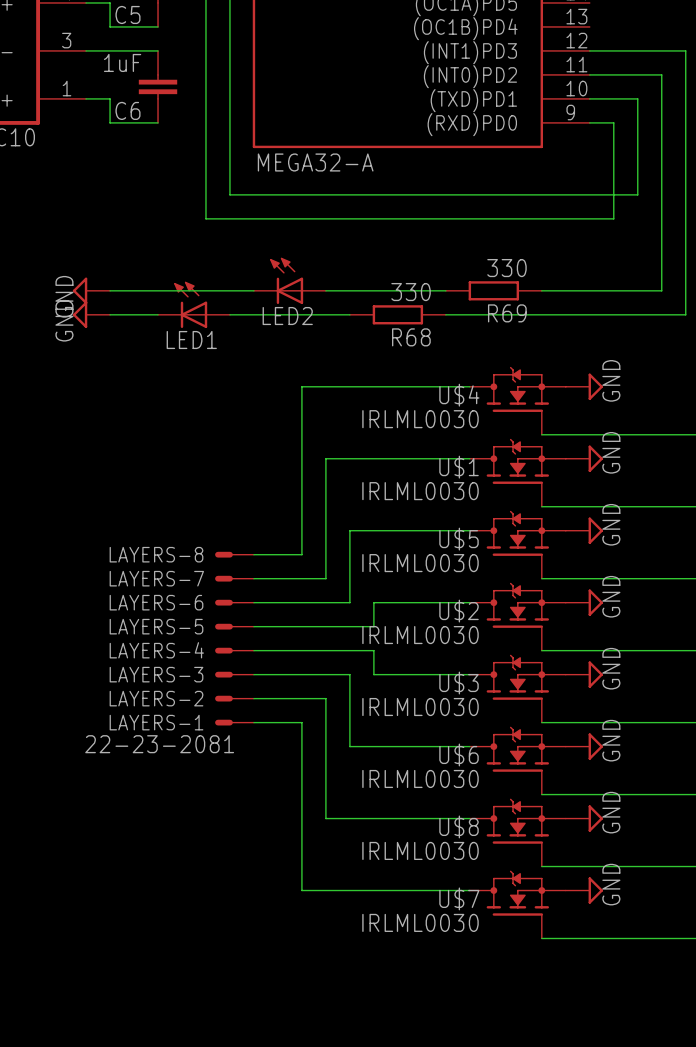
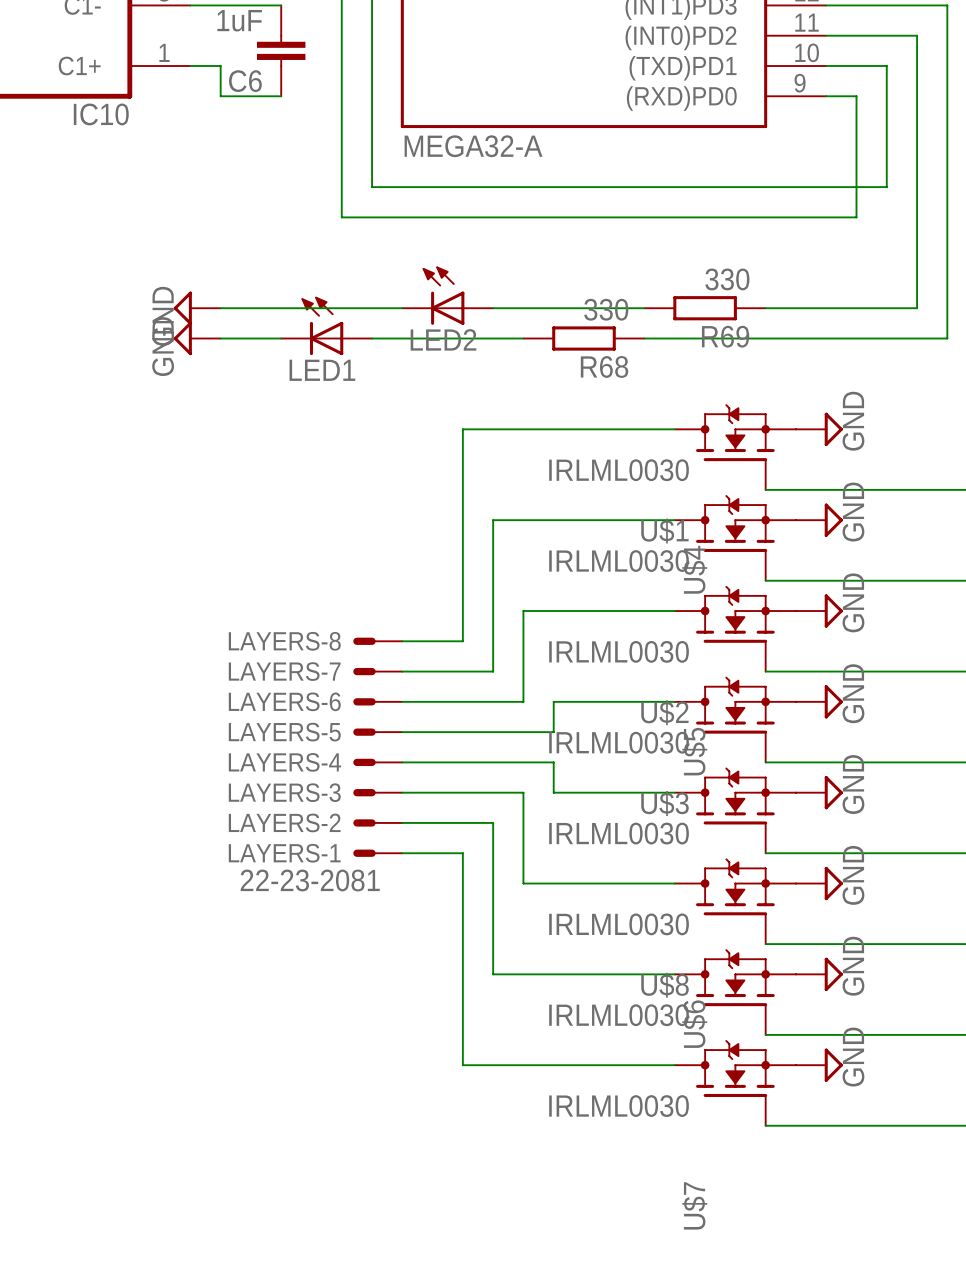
U$4 name rotation: 0° (459, 395) -> 90° counterclockwise (694, 569)
U$4 name position: U$4 (459, 395) -> U$4 (694, 569)
U$5 name rotation: 0° (459, 539) -> 90° counterclockwise (694, 751)
U$5 name position: U$5 (459, 539) -> U$5 (694, 751)
U$6 name rotation: 0° (459, 754) -> 90° counterclockwise (694, 1024)
U$6 name position: U$6 (459, 754) -> U$6 (694, 1024)
U$7 name rotation: 0° (459, 898) -> 90° counterclockwise (694, 1205)
U$7 name position: U$7 (459, 898) -> U$7 (694, 1205)

